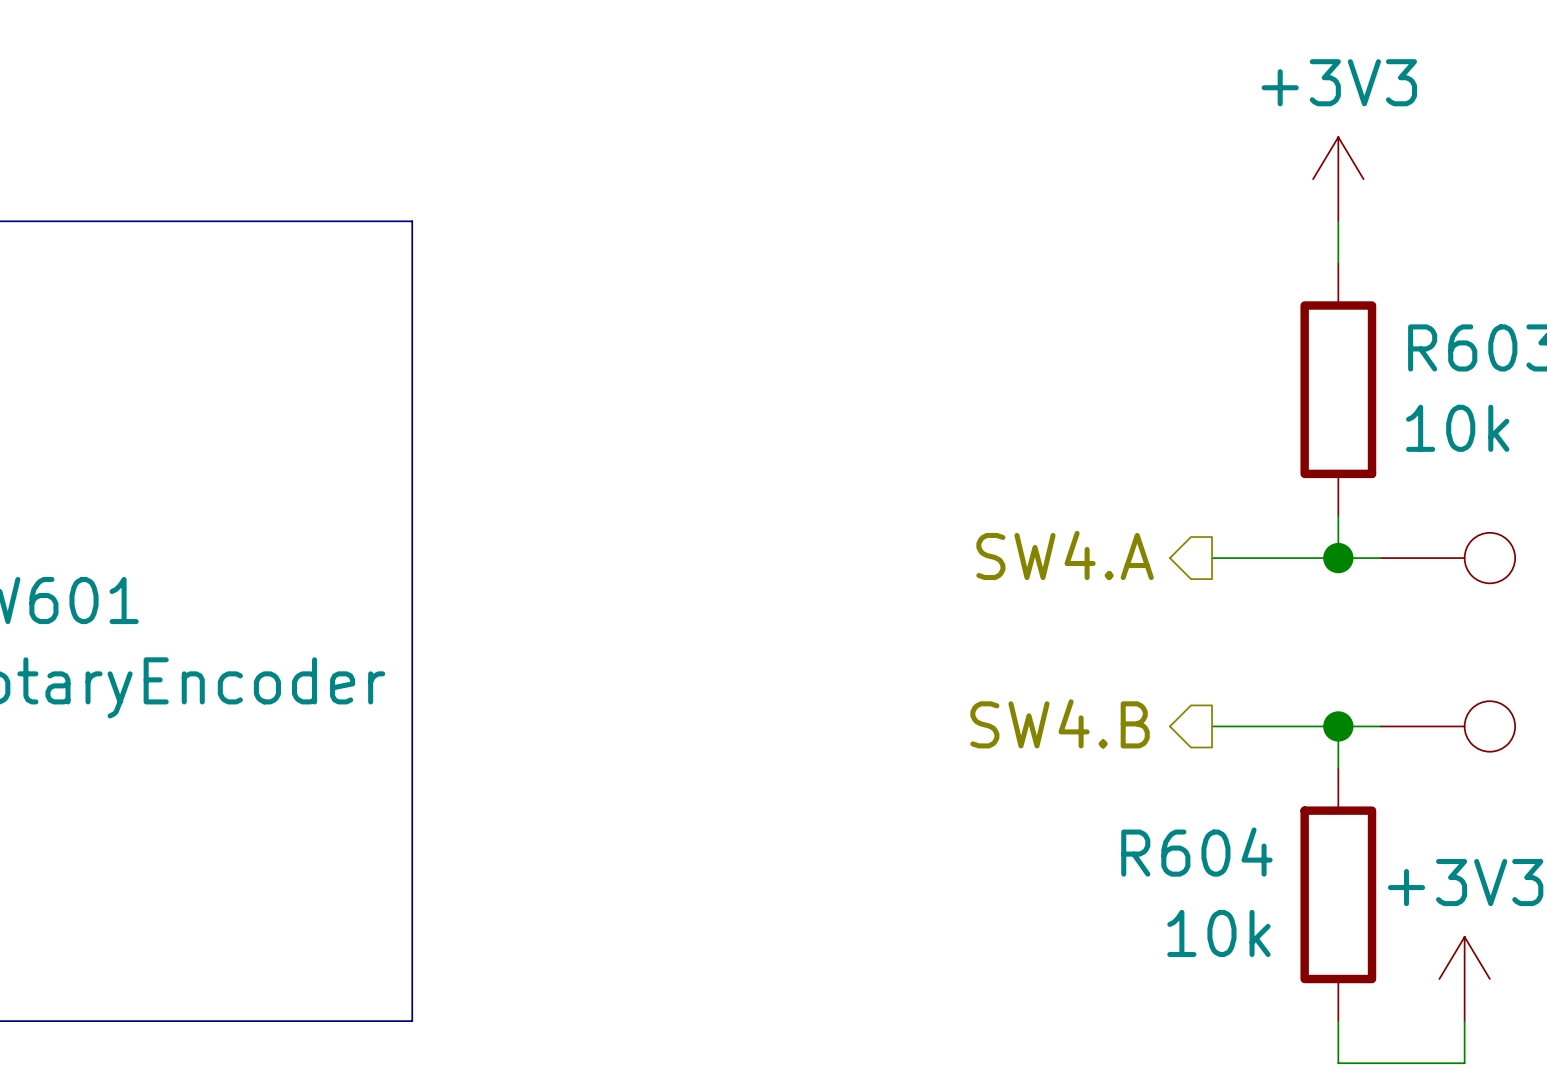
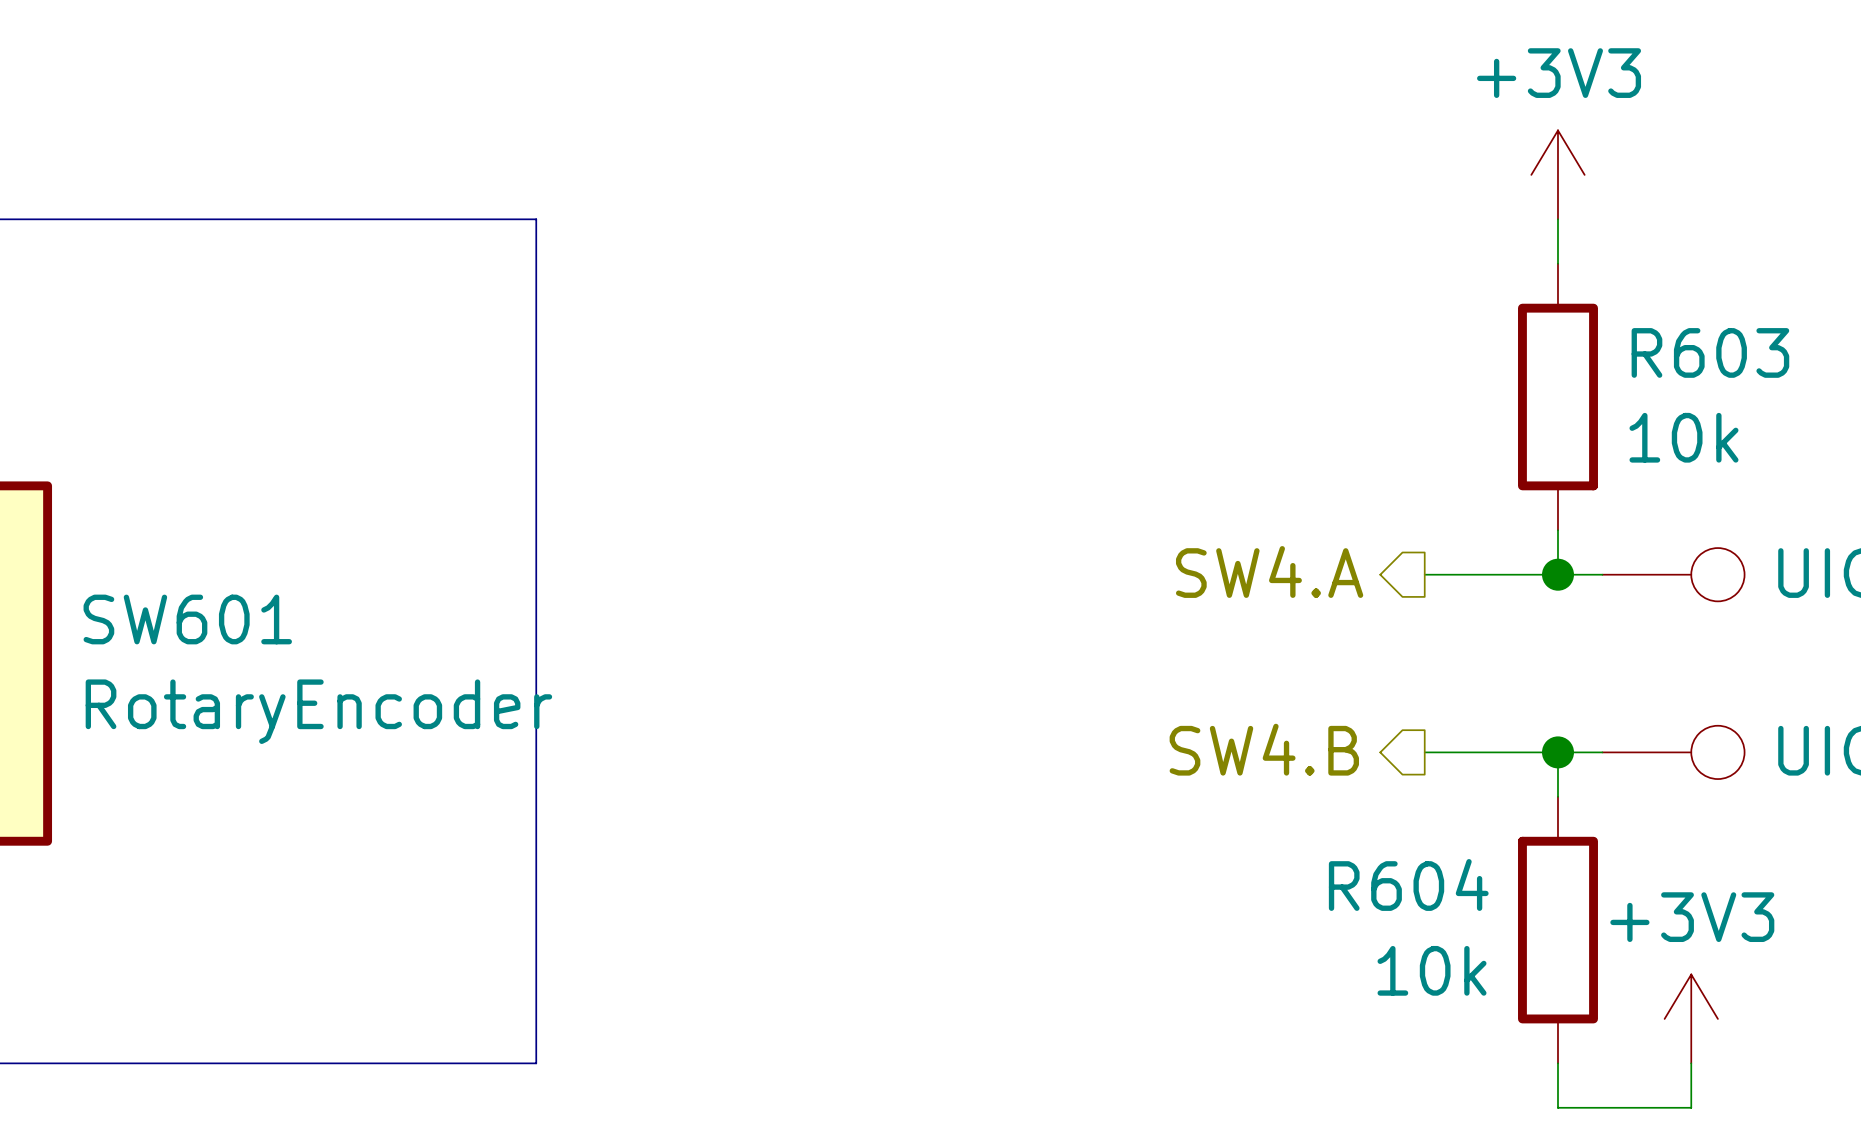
line: (370, 221) (412, 221) (412, 1021) (370, 1021) -> (536, 219) (536, 1063)

